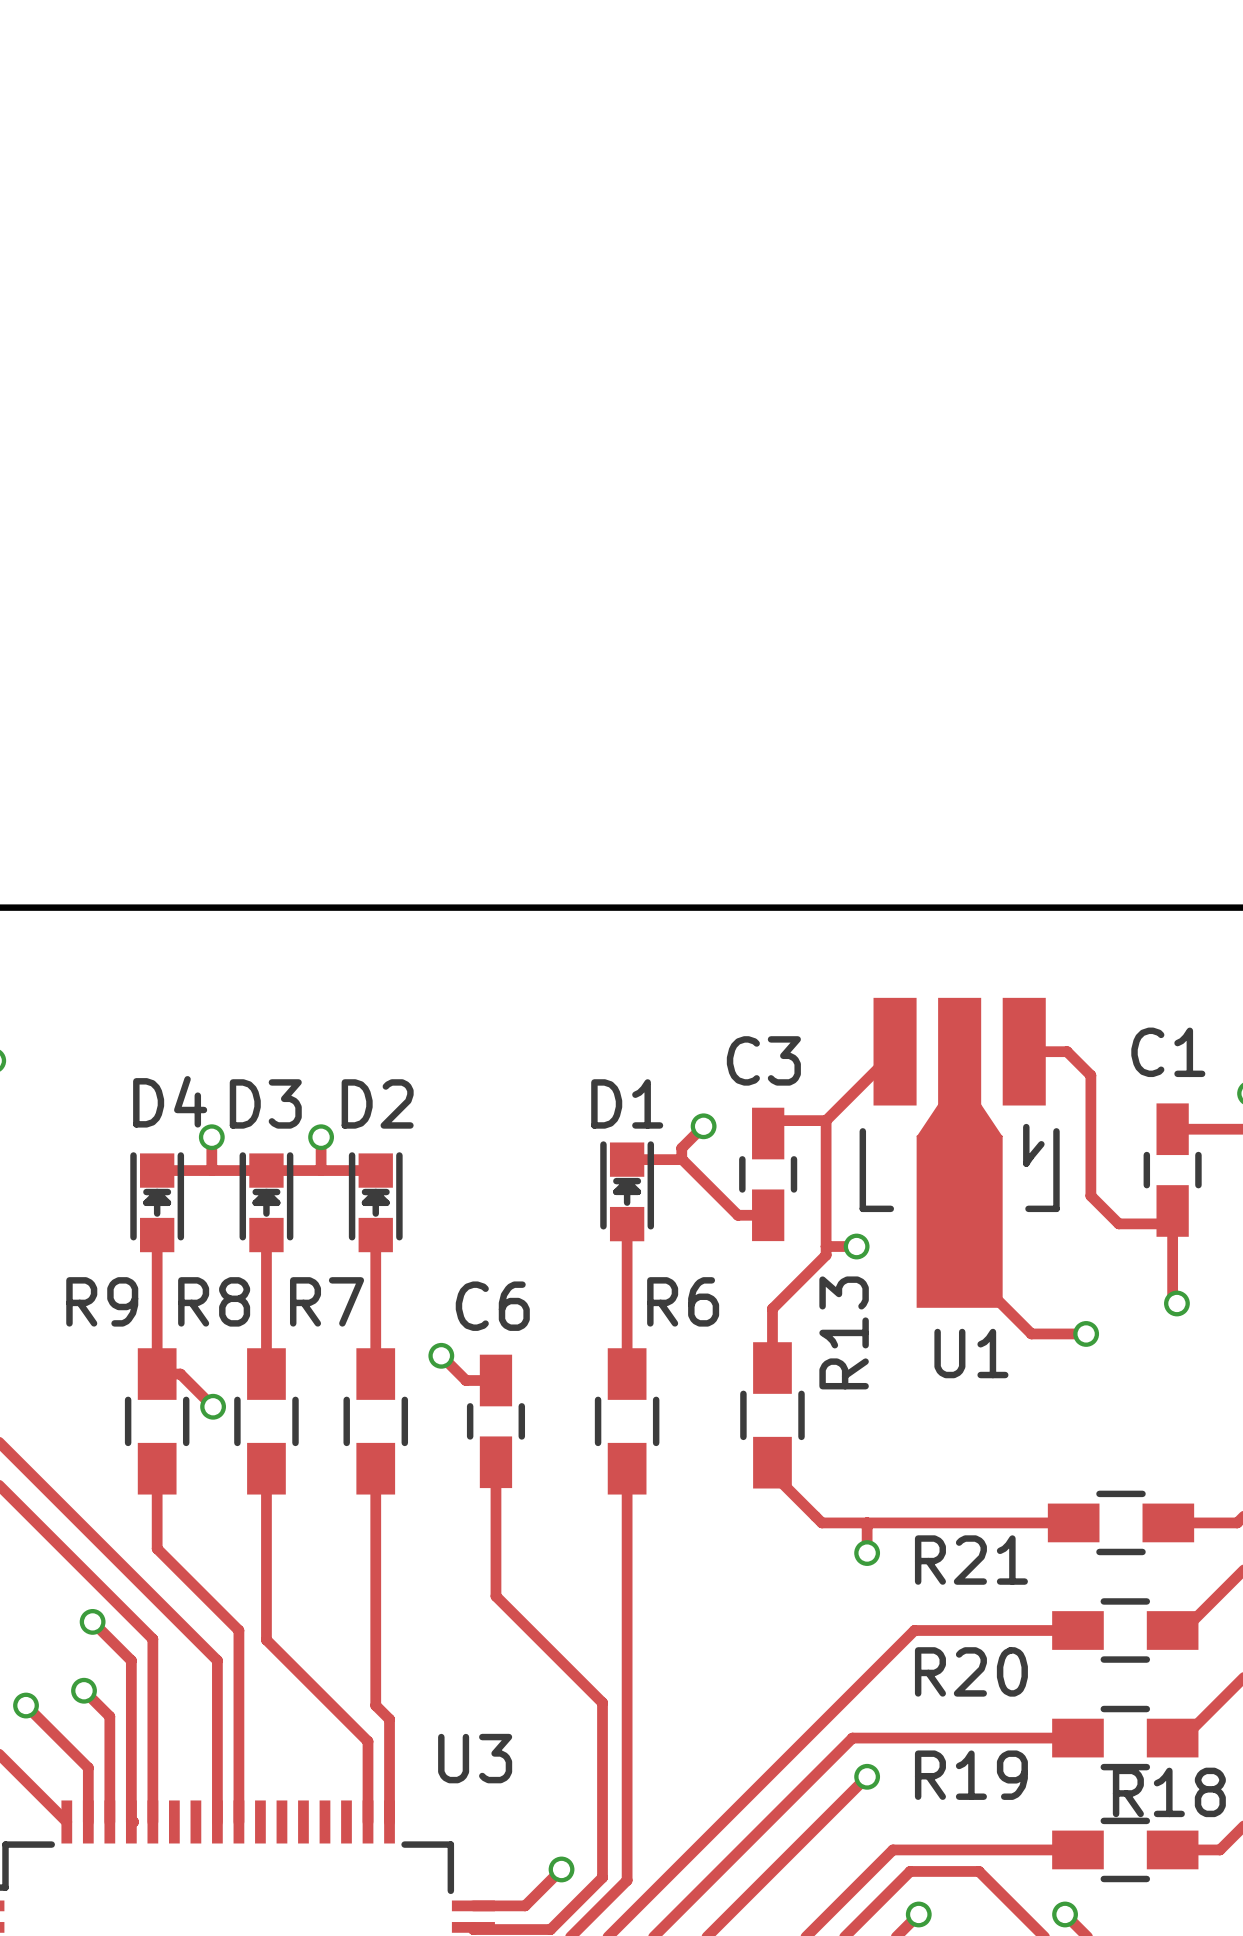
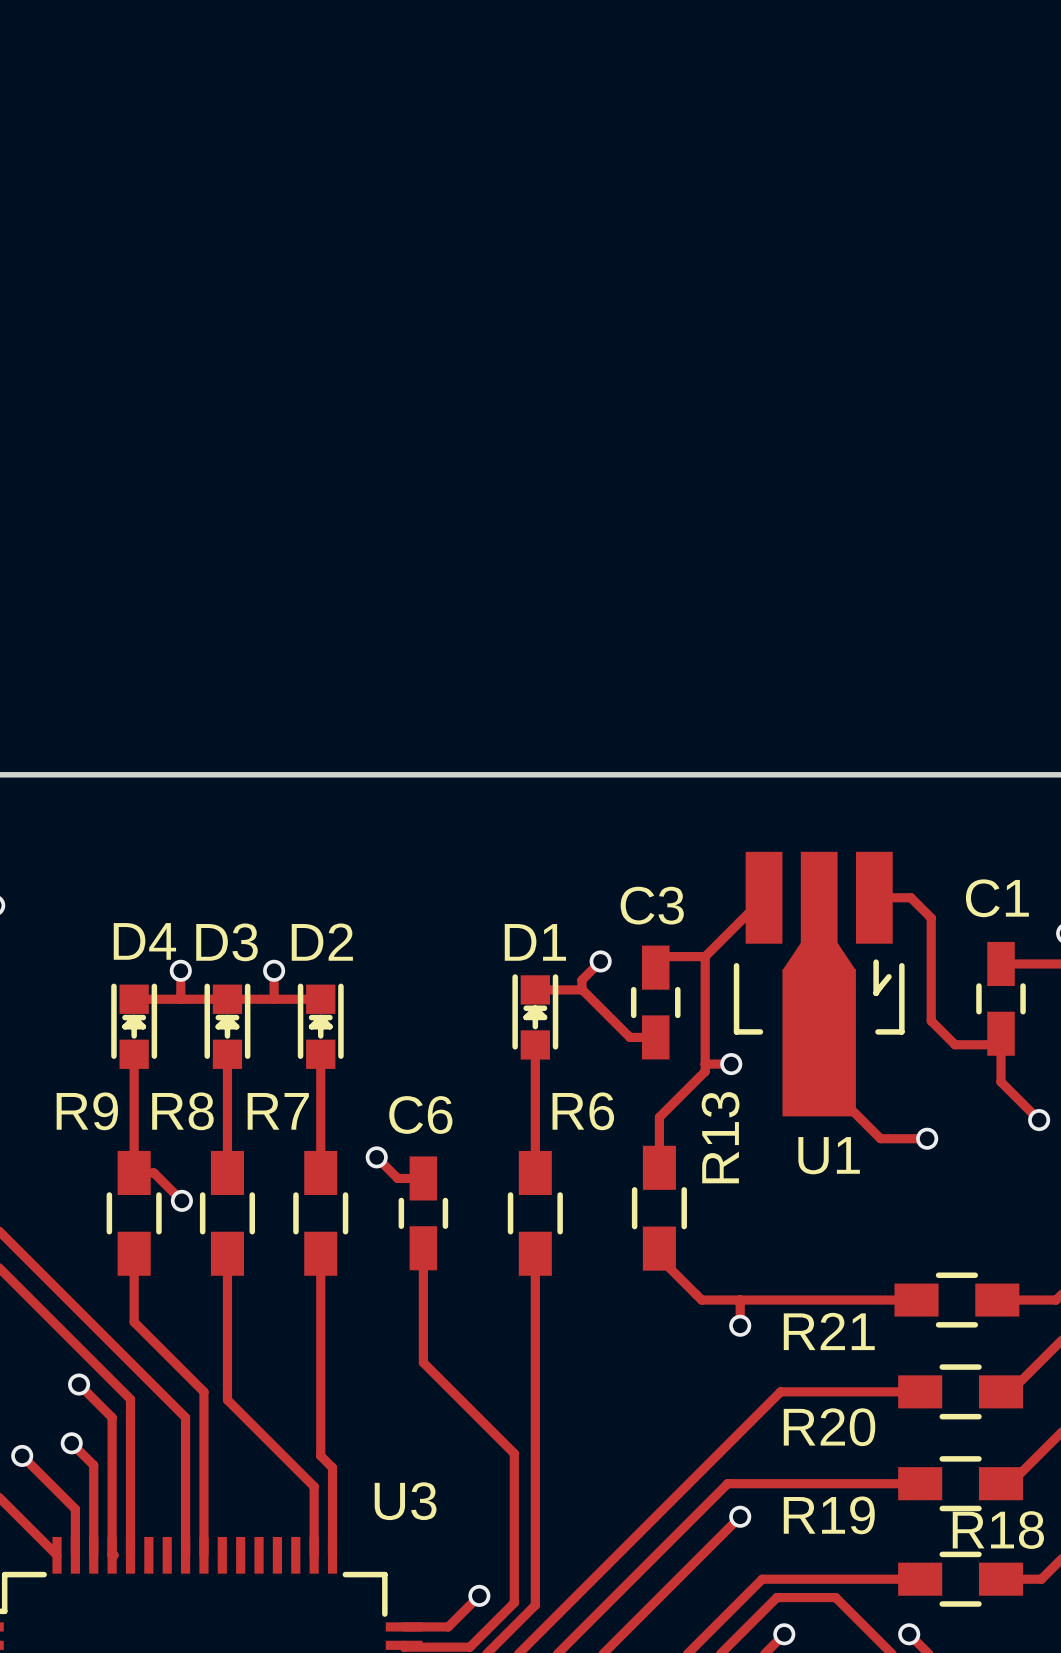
track: (1172, 1267) (1172, 1299) (1176, 1303) -> (1001, 1081) (1039, 1120)
via position: (1176, 1303) -> (1039, 1120)

